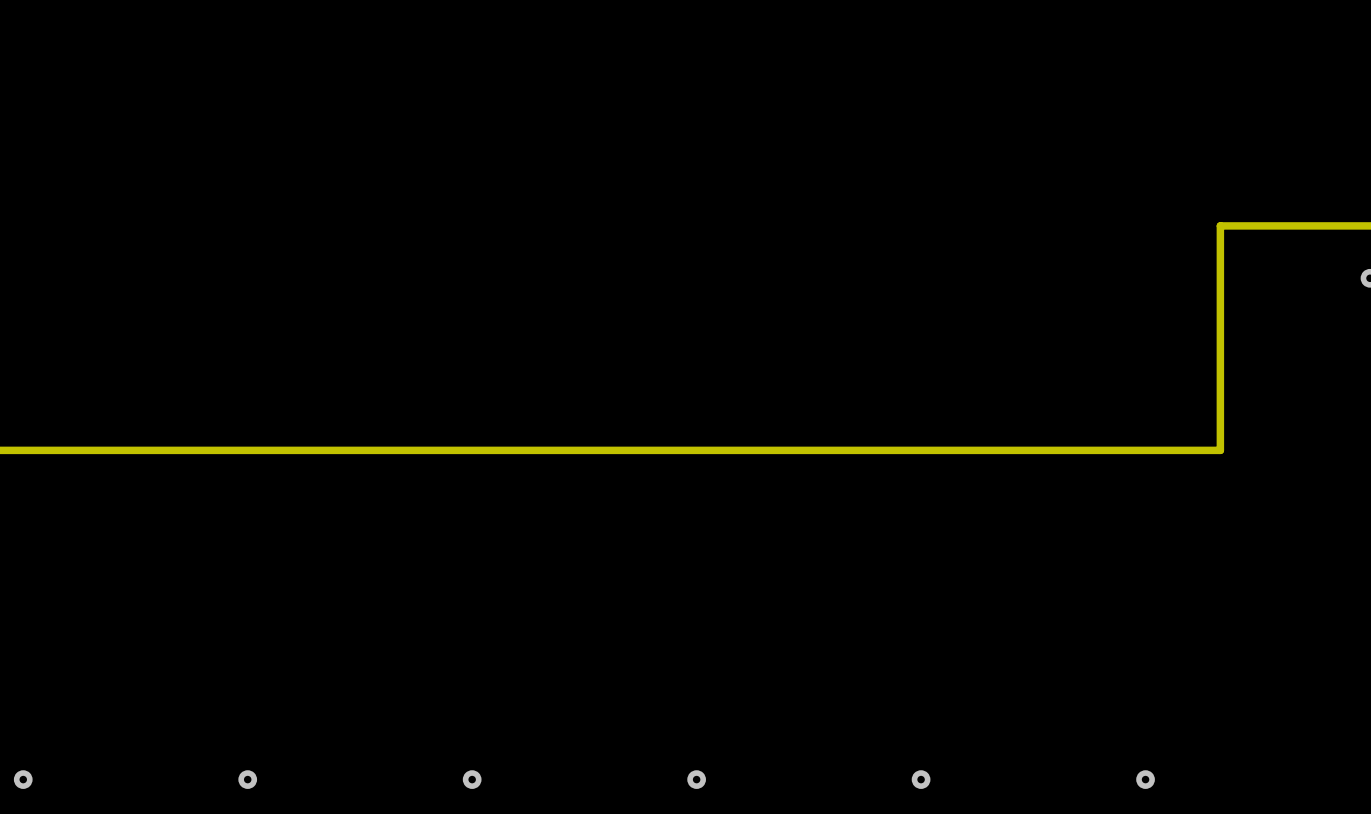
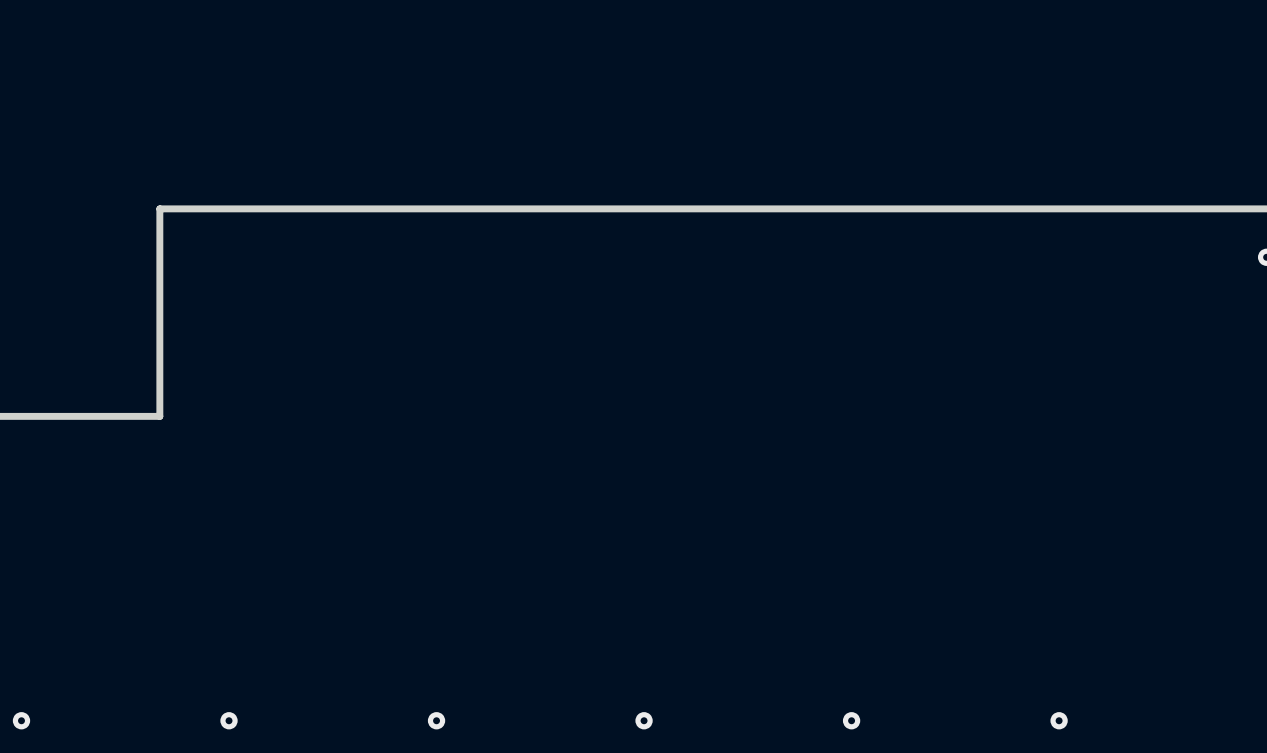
board edge: (1220, 225) (1220, 450) (172, 450) -> (1128, 208) (159, 208) (159, 416)

